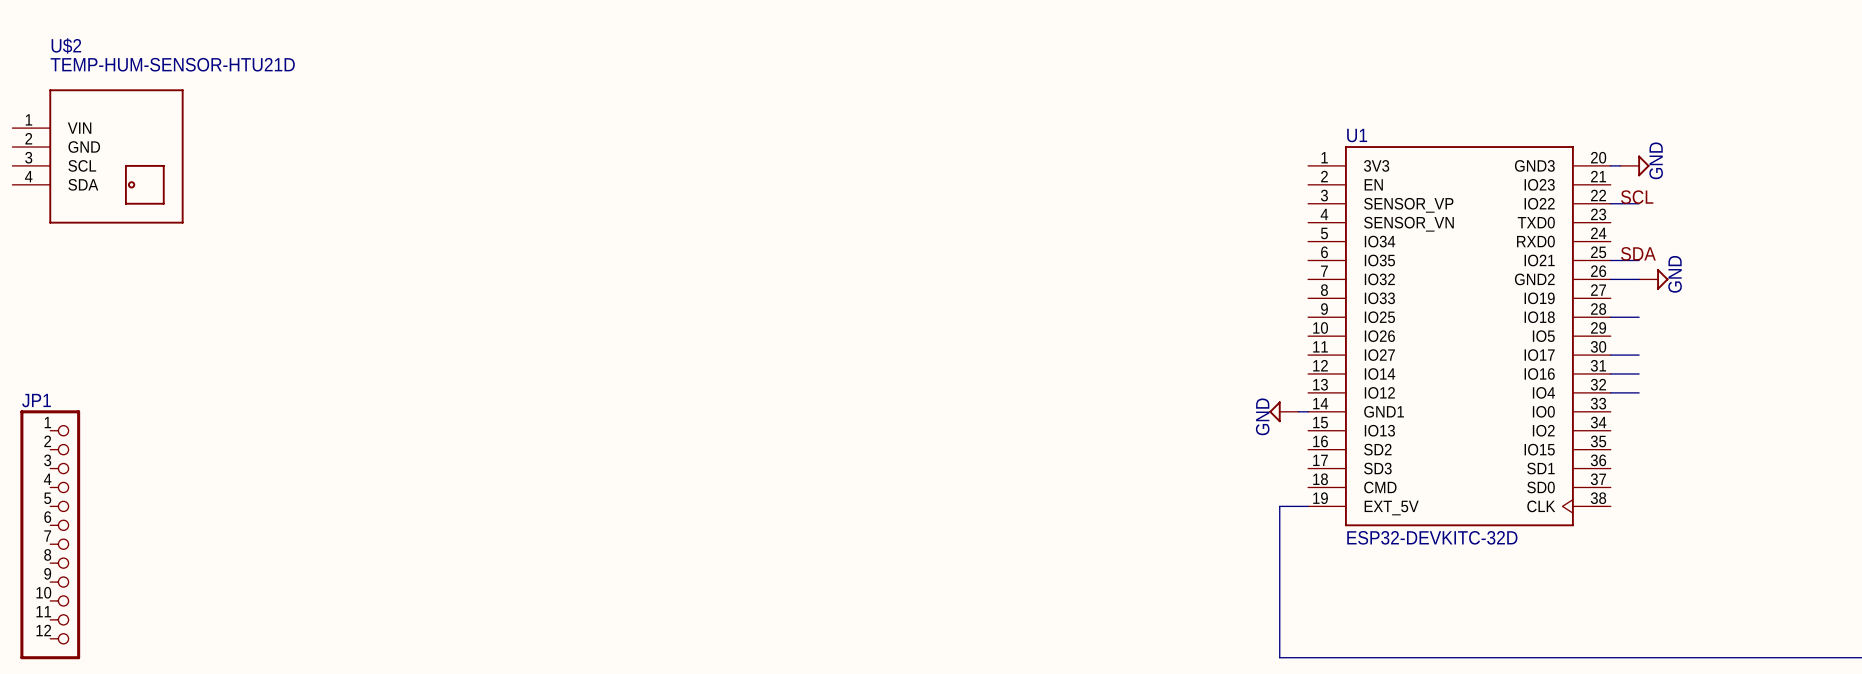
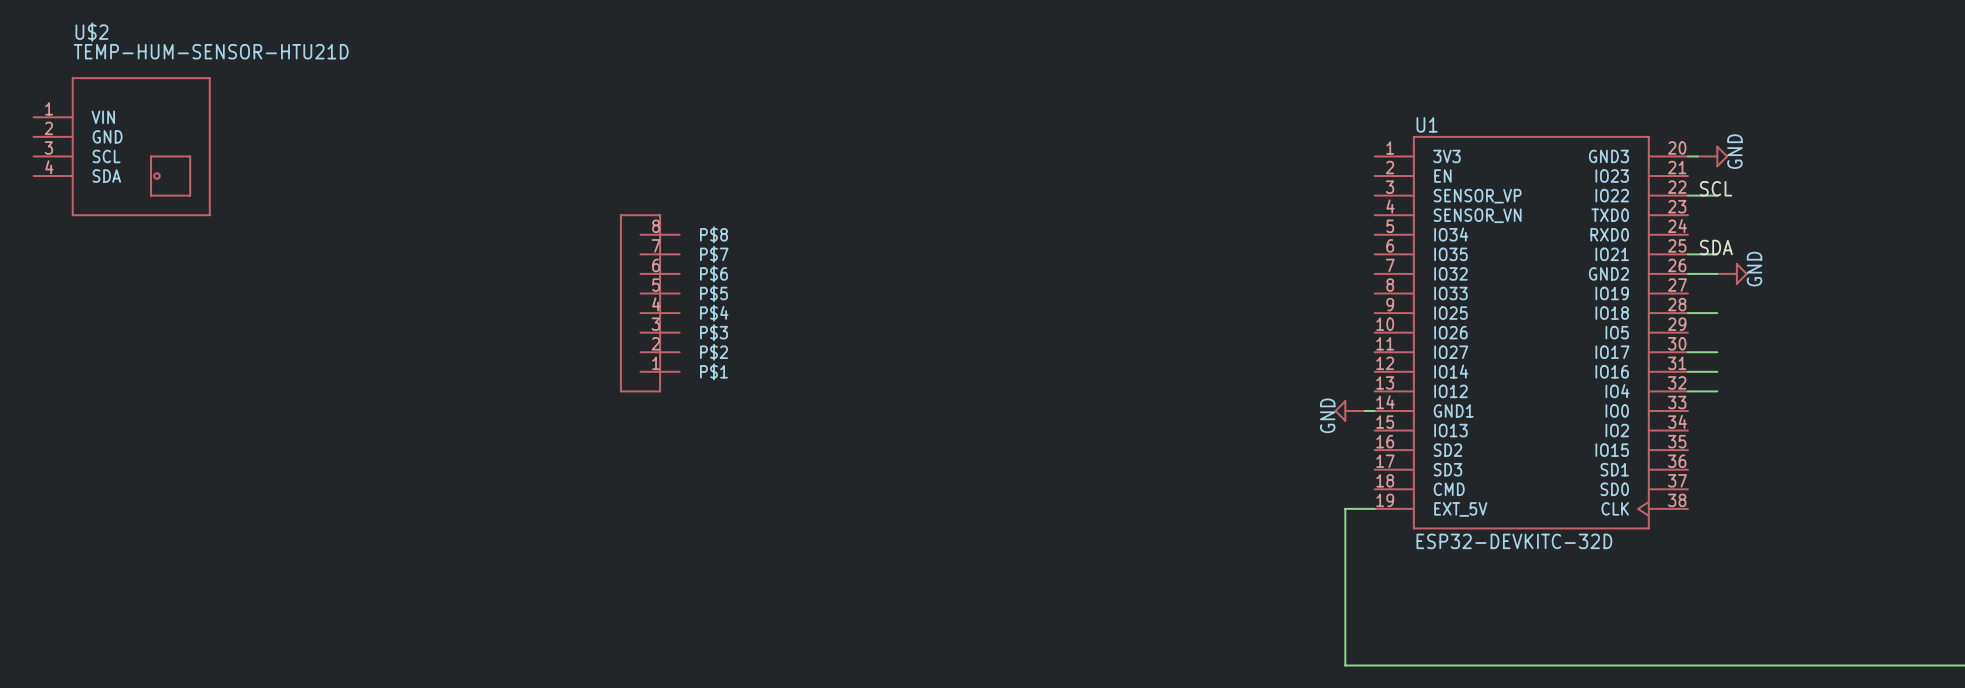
part: none -> (650, 303)
JP1: (50, 534) -> none

